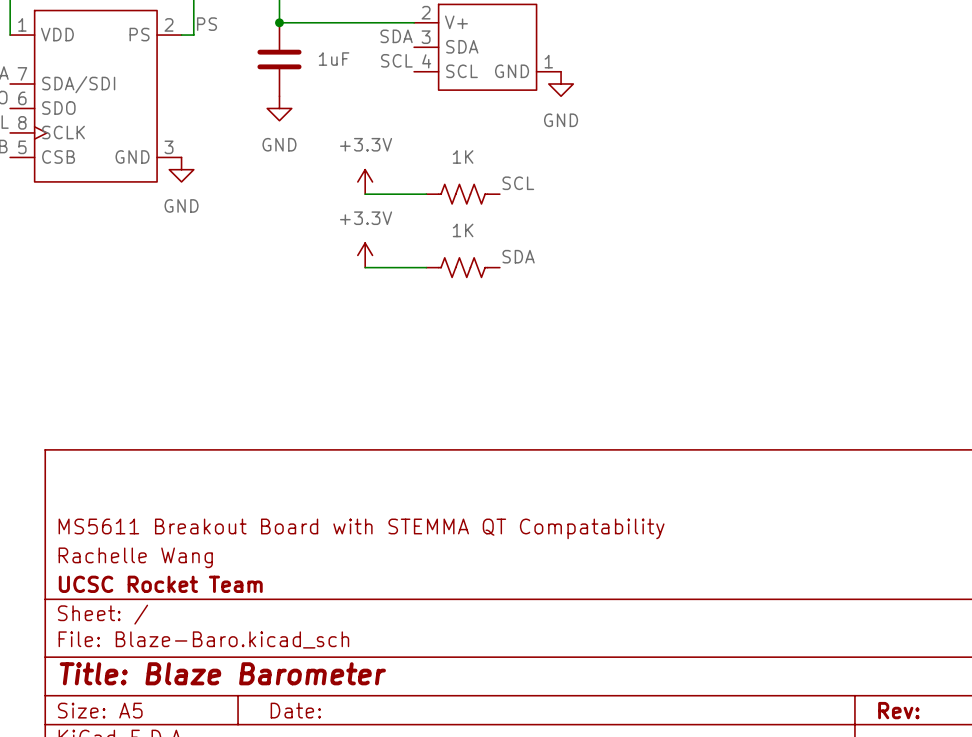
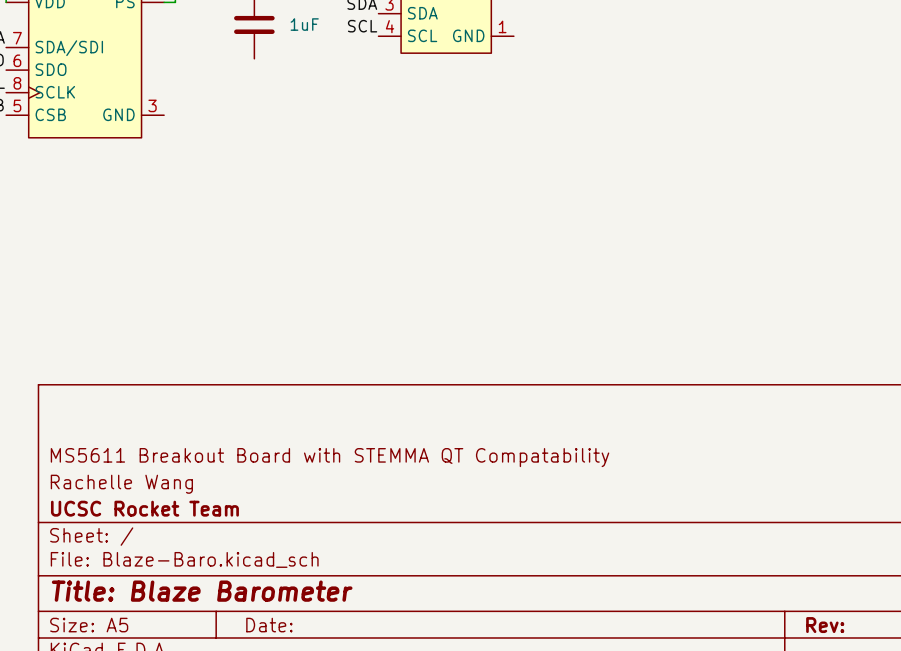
power symbol: GND (561, 83) -> none
power symbol: GND (279, 108) -> none
power symbol: GND (181, 169) -> none
power symbol: +3.3V (365, 181) -> none
label: SCL (518, 183) -> none
wire: (365, 194) (426, 194) -> none
part: 1K (463, 194) -> none
power symbol: +3.3V (365, 255) -> none
label: SDA (518, 256) -> none
wire: (365, 267) (426, 267) -> none
part: 1K (463, 267) -> none

